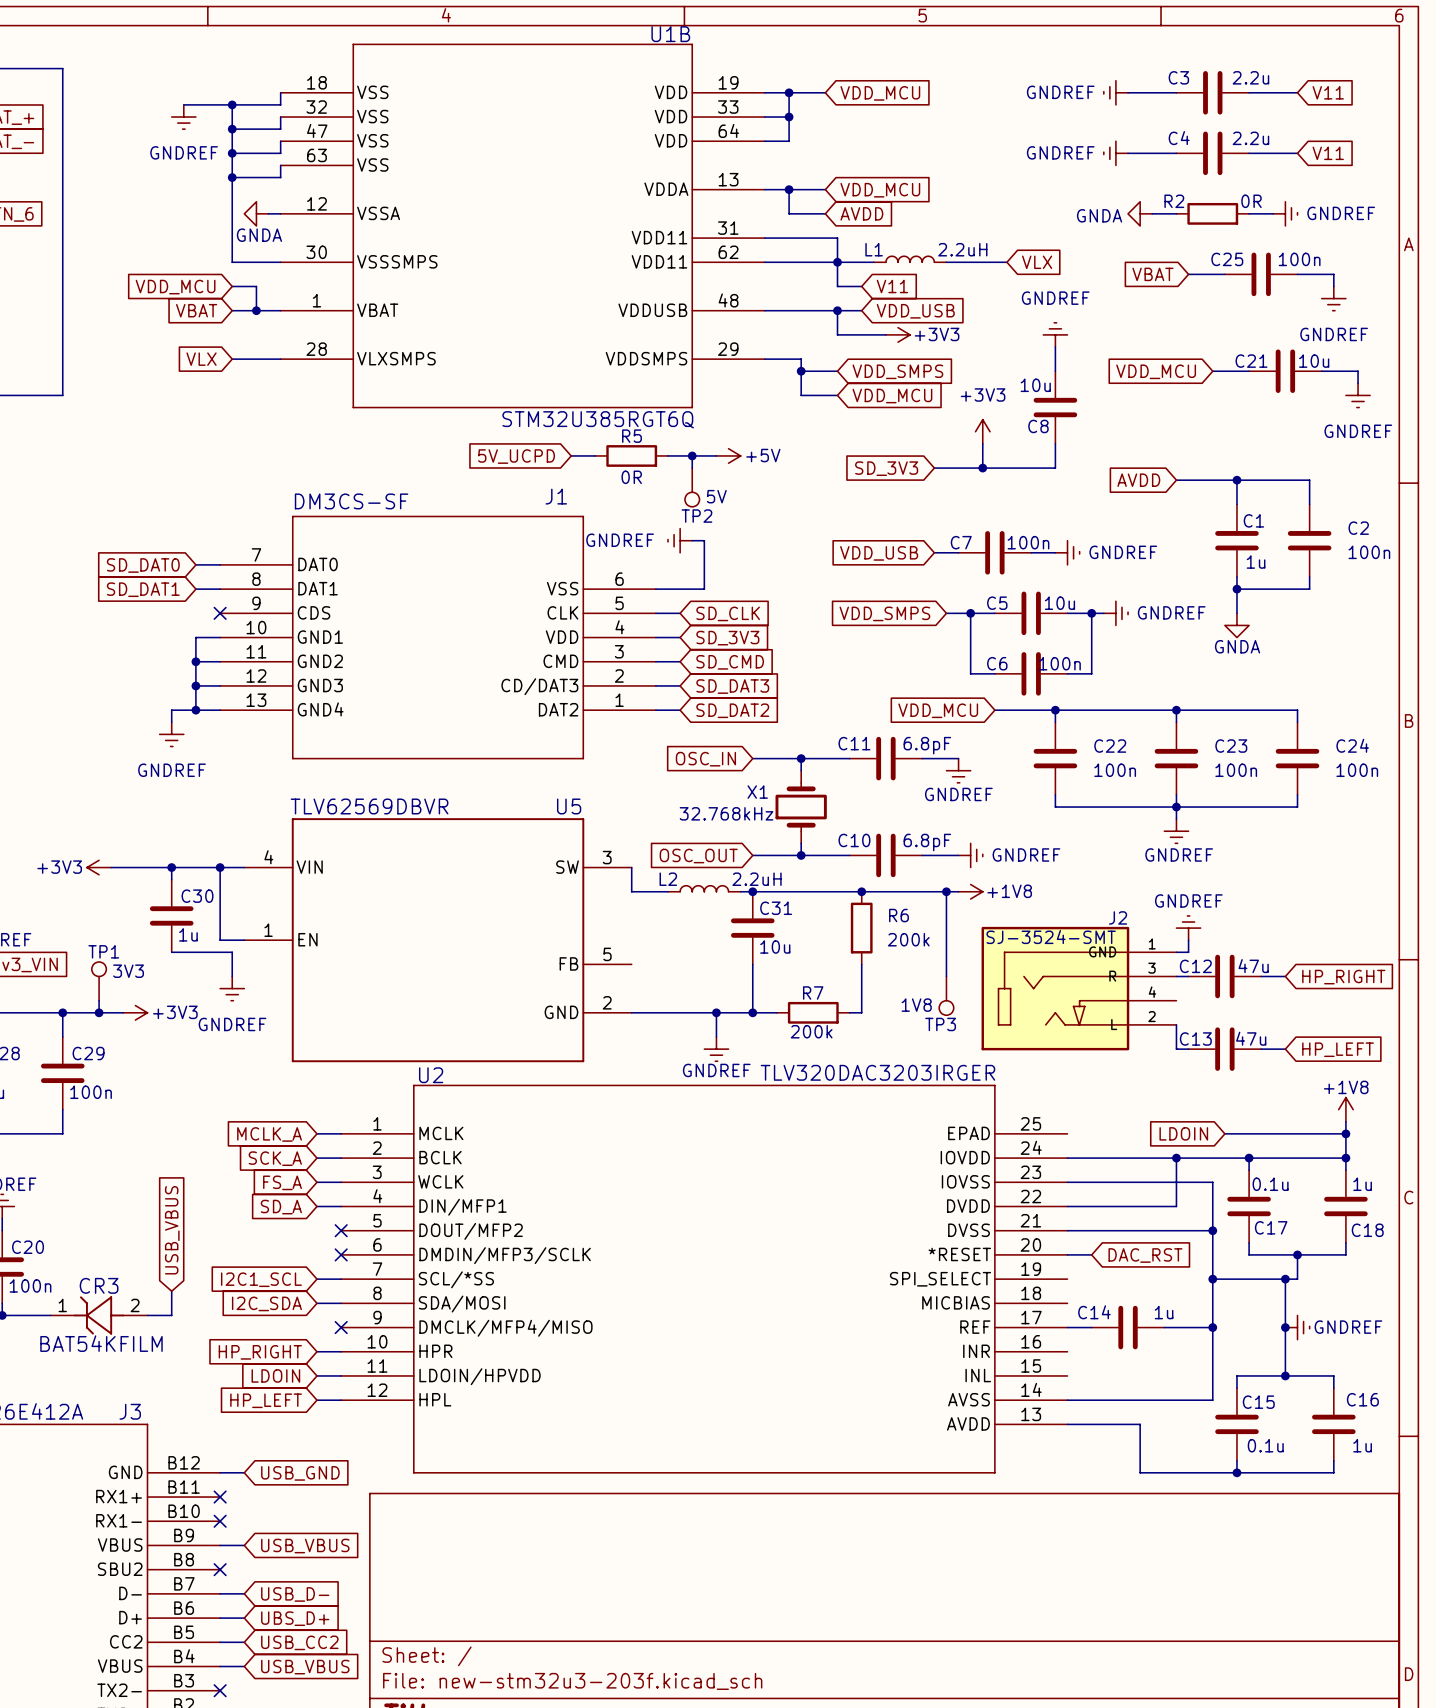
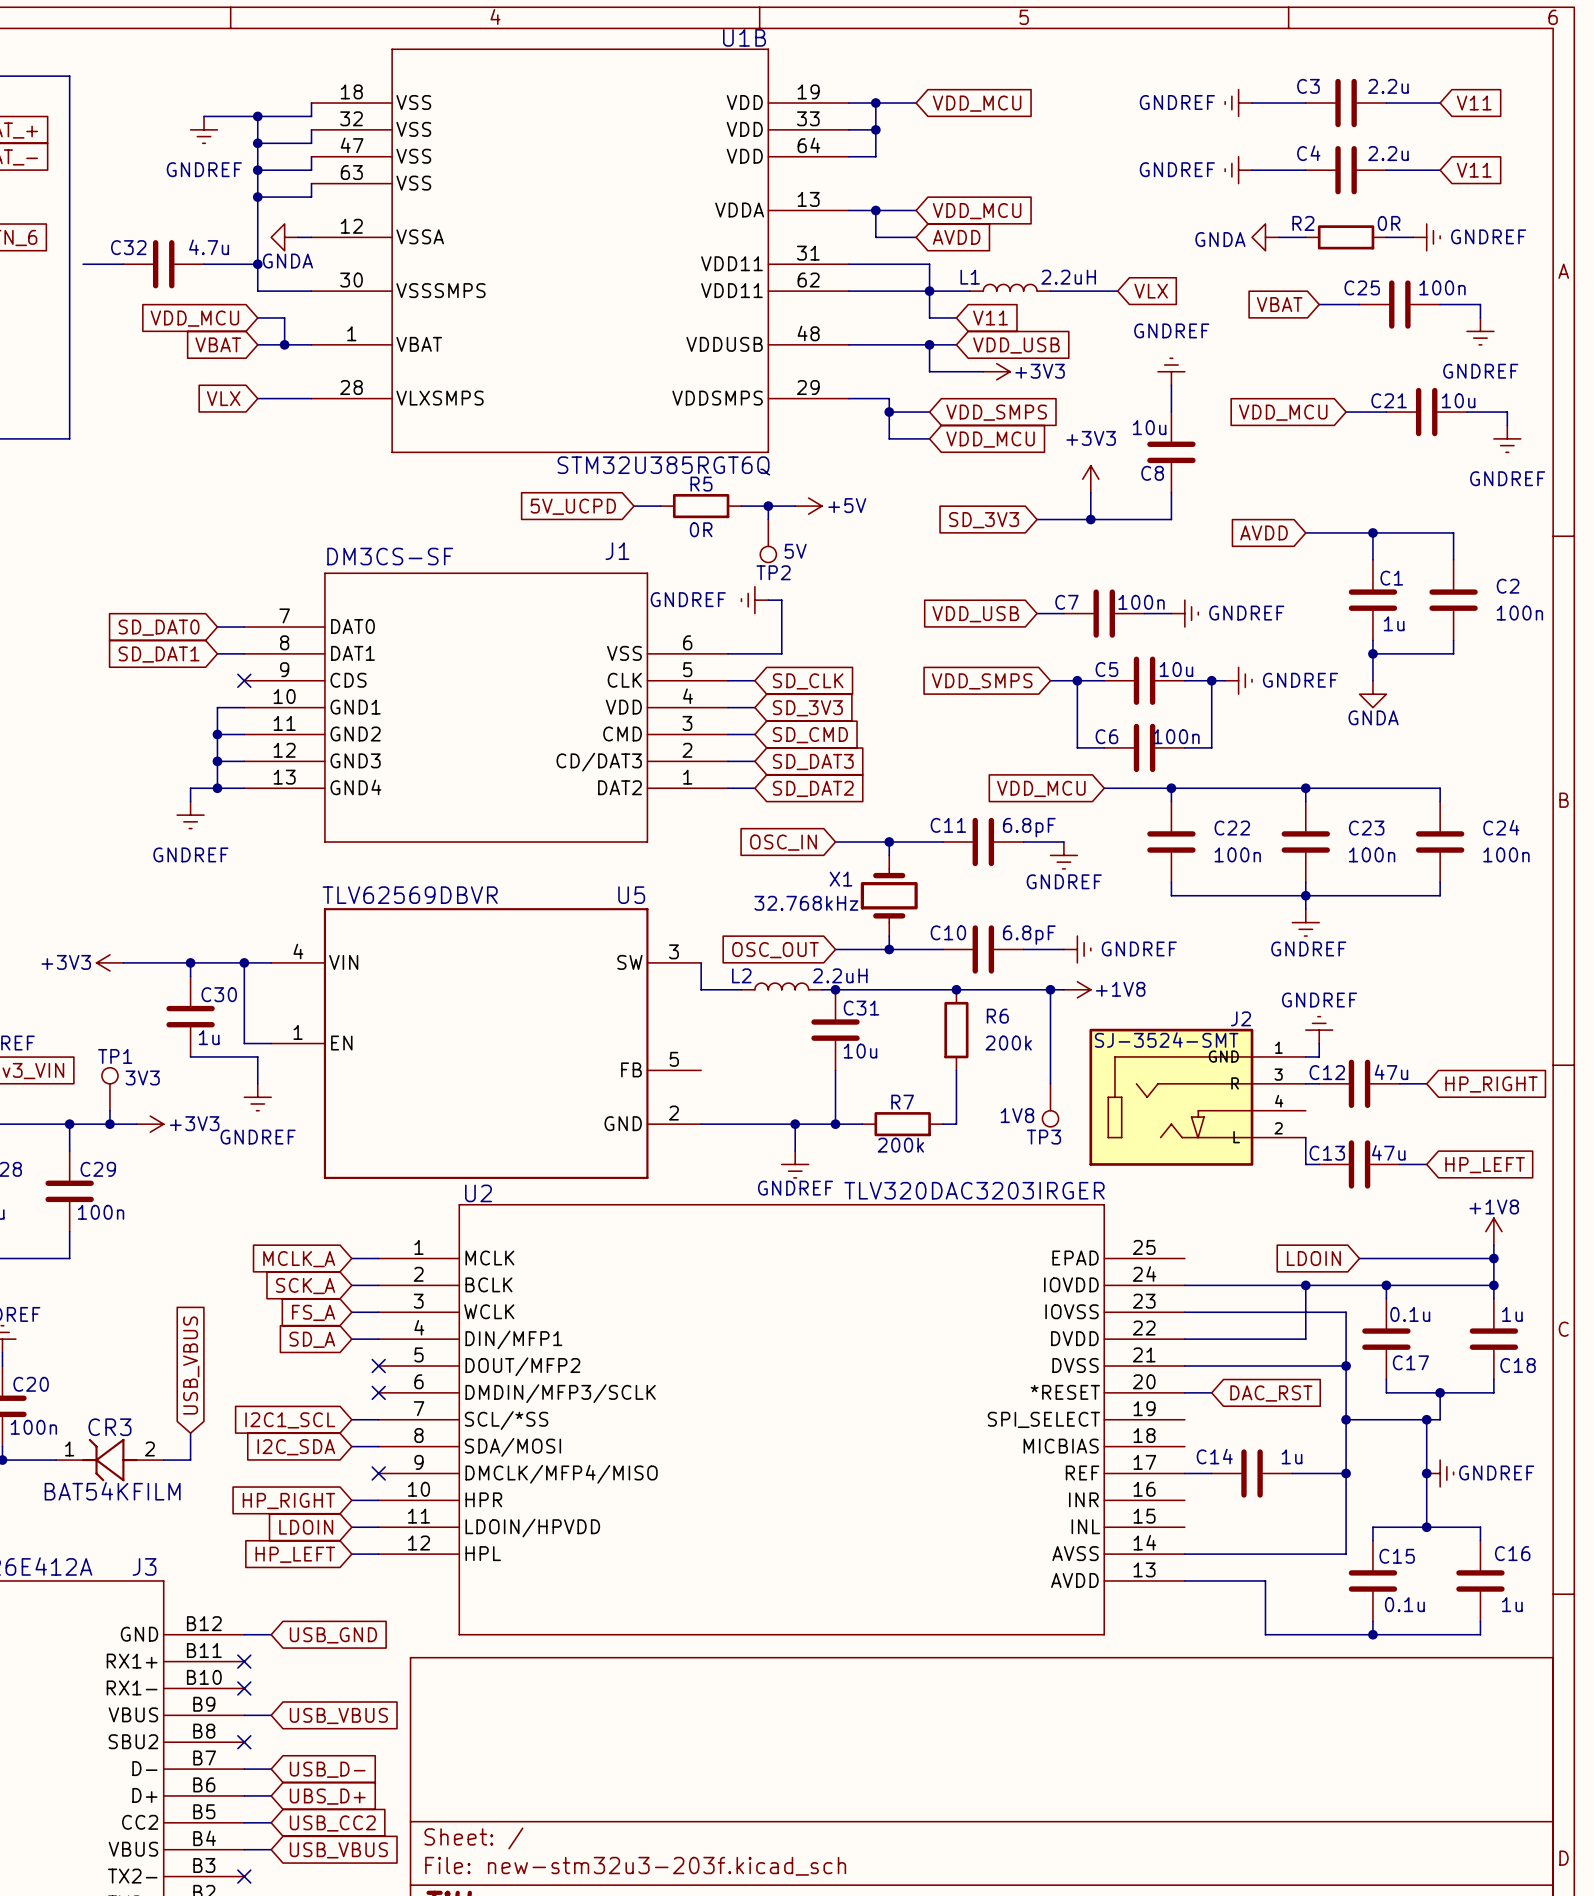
wire: none -> (83, 264) (123, 264)
C32: none -> 4.7u (163, 264)
wire: none -> (204, 264) (257, 264)
junction: none -> (257, 264)

